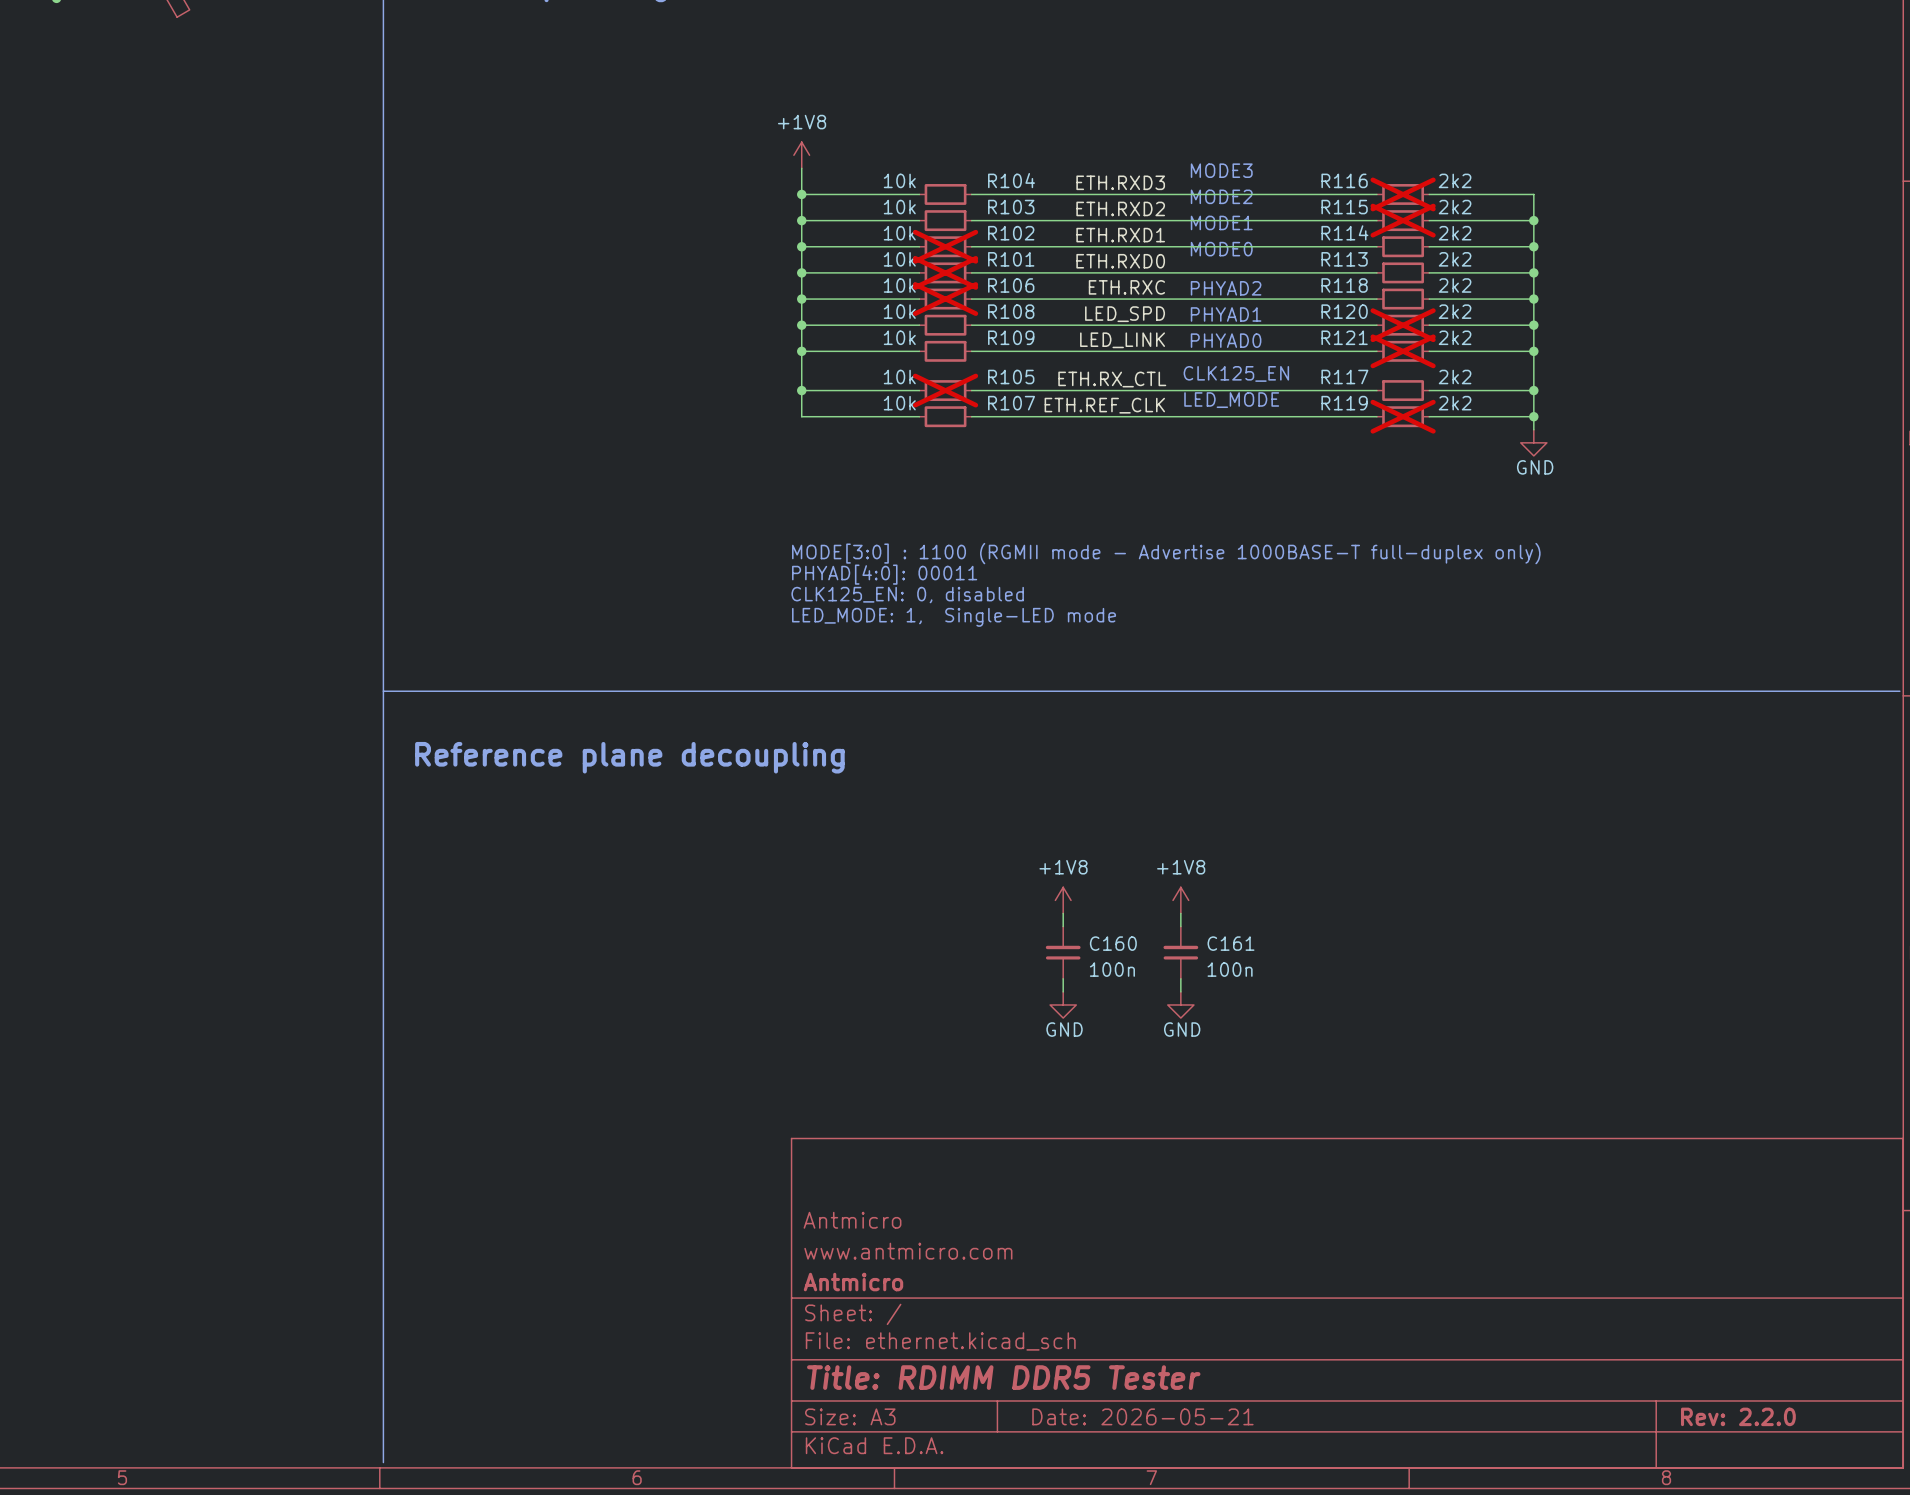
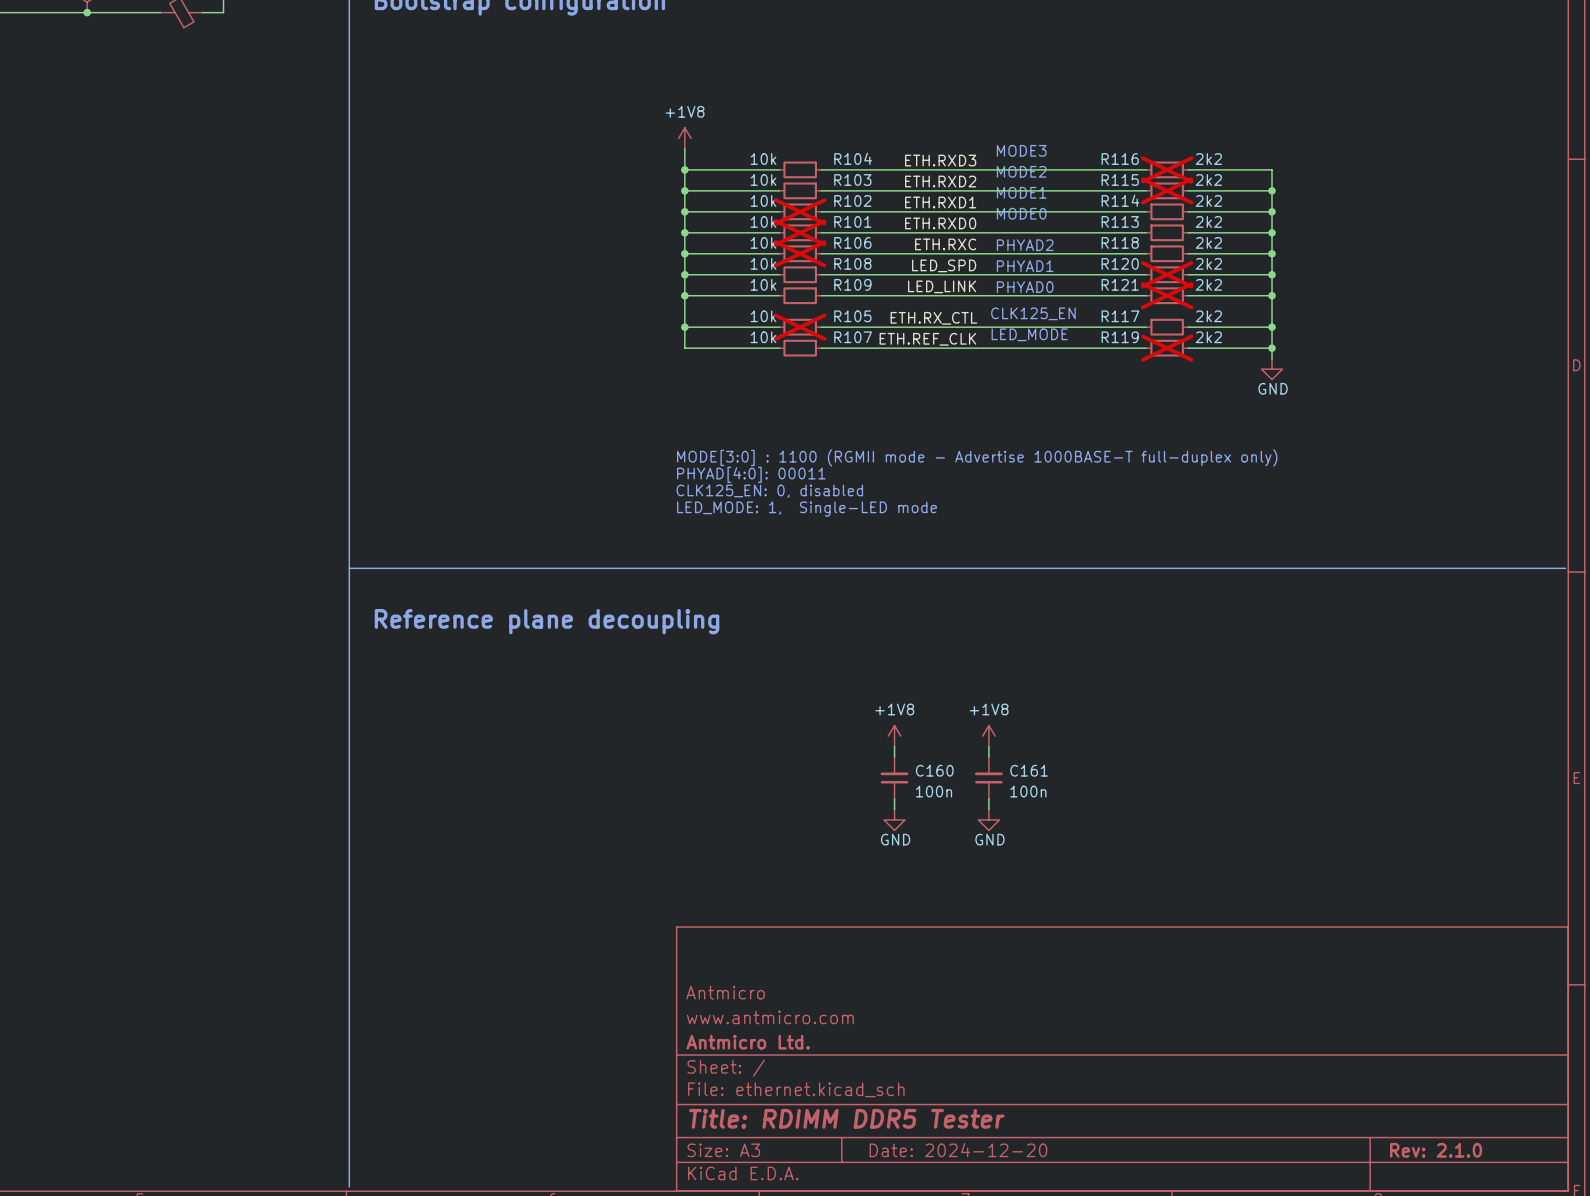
title block: Antmicro (853, 1282) -> Antmicro Ltd. (748, 1042)
title block: Date: 2026-05-21 (1142, 1416) -> Date: 2024-12-20 (958, 1150)
title block: Rev: 2.2.0 (1738, 1416) -> Rev: 2.1.0 (1436, 1150)

